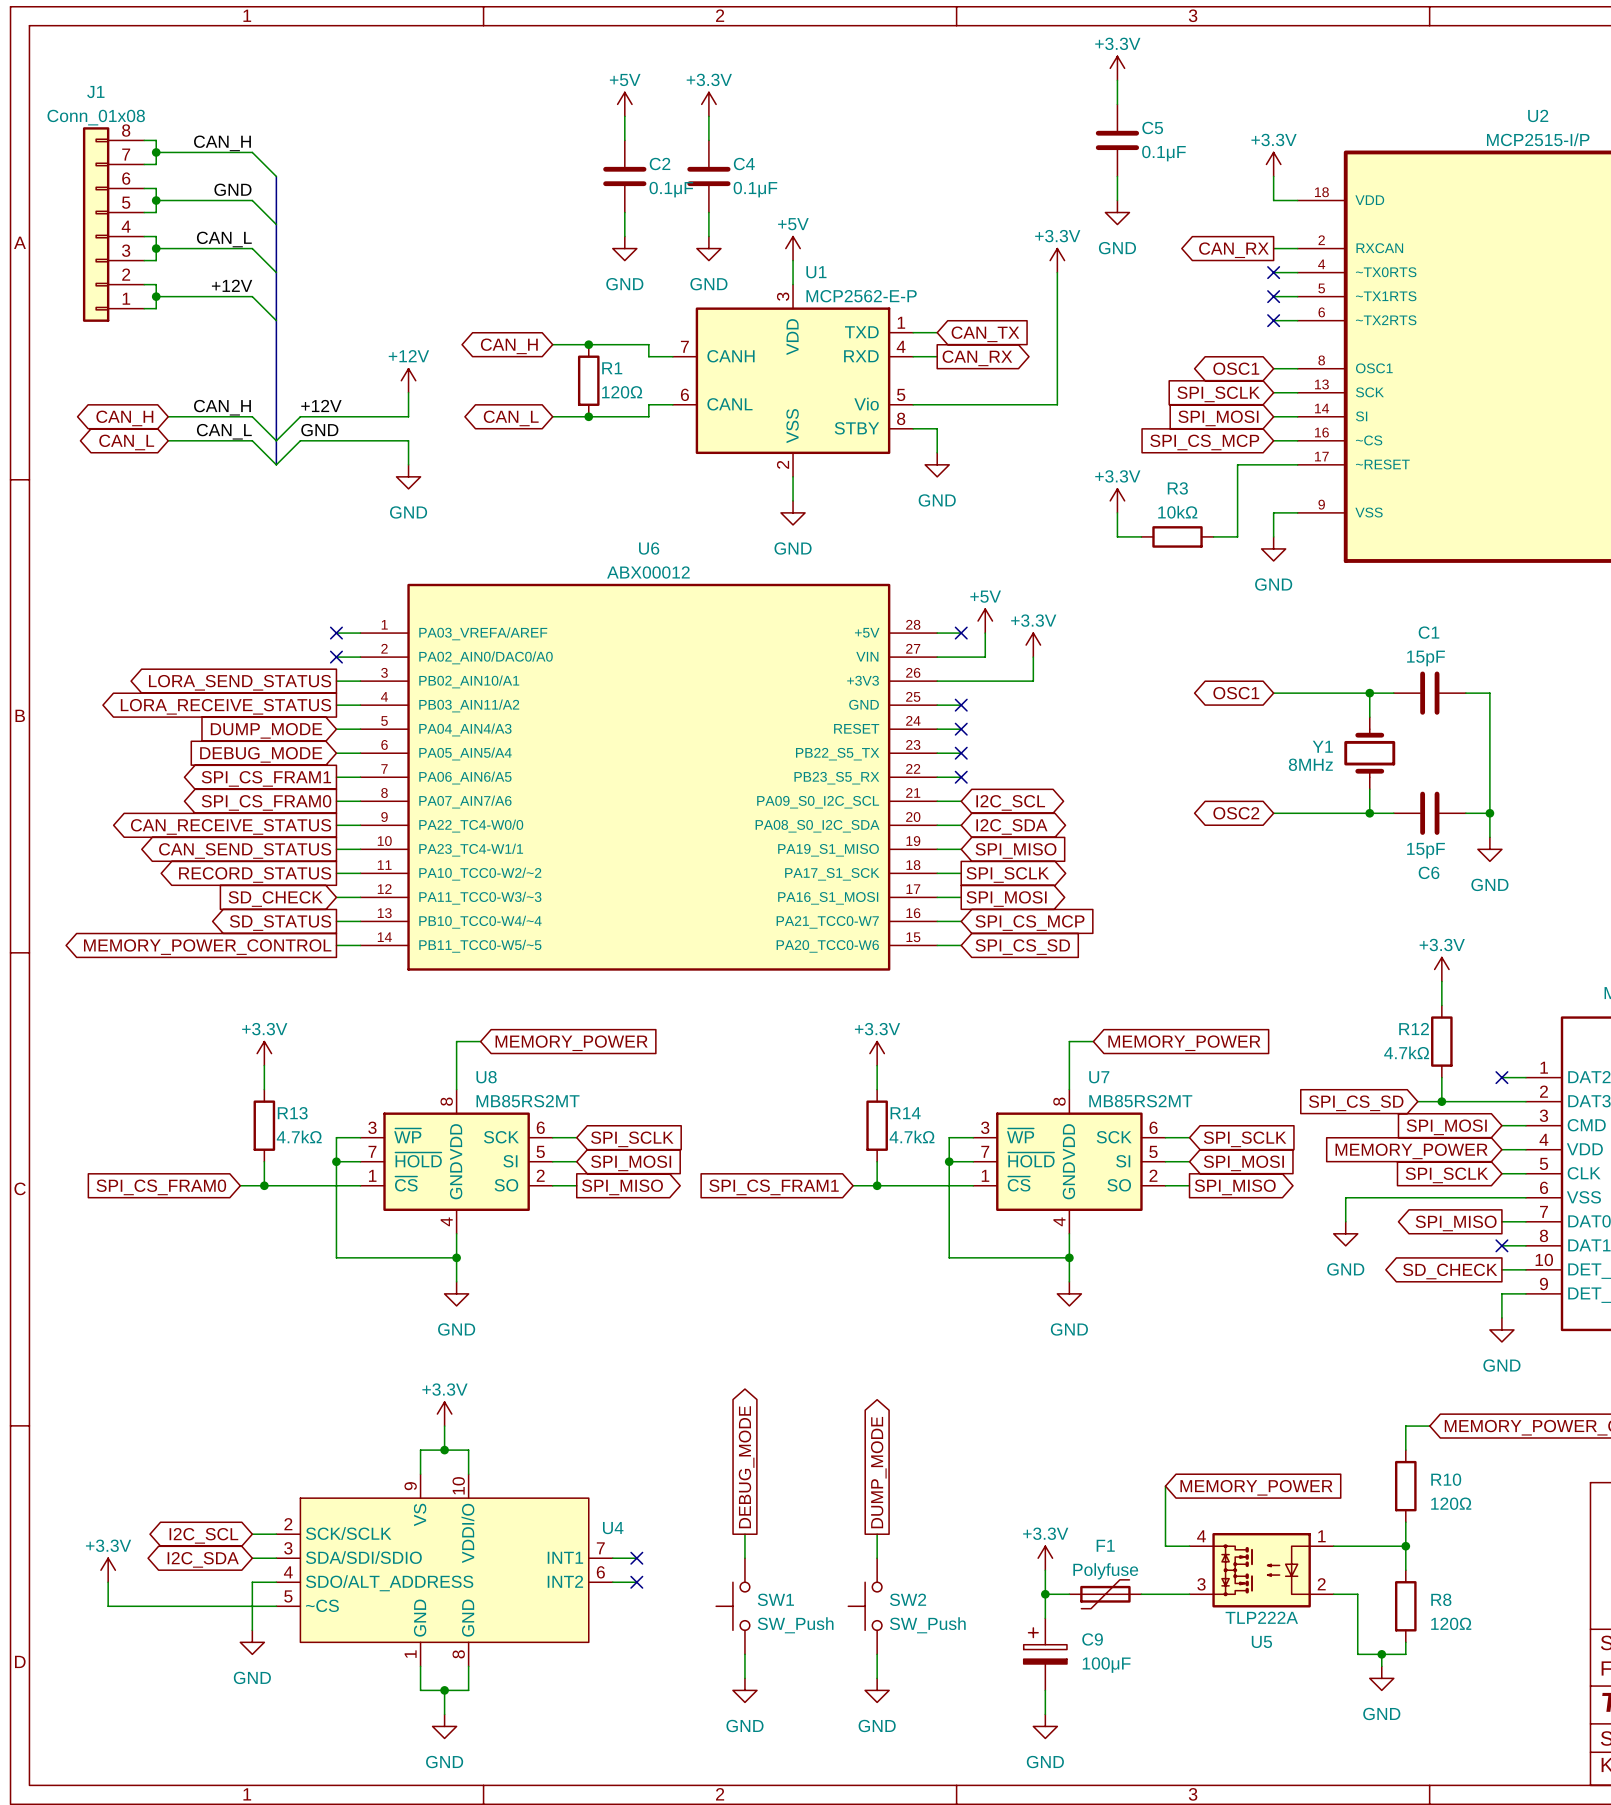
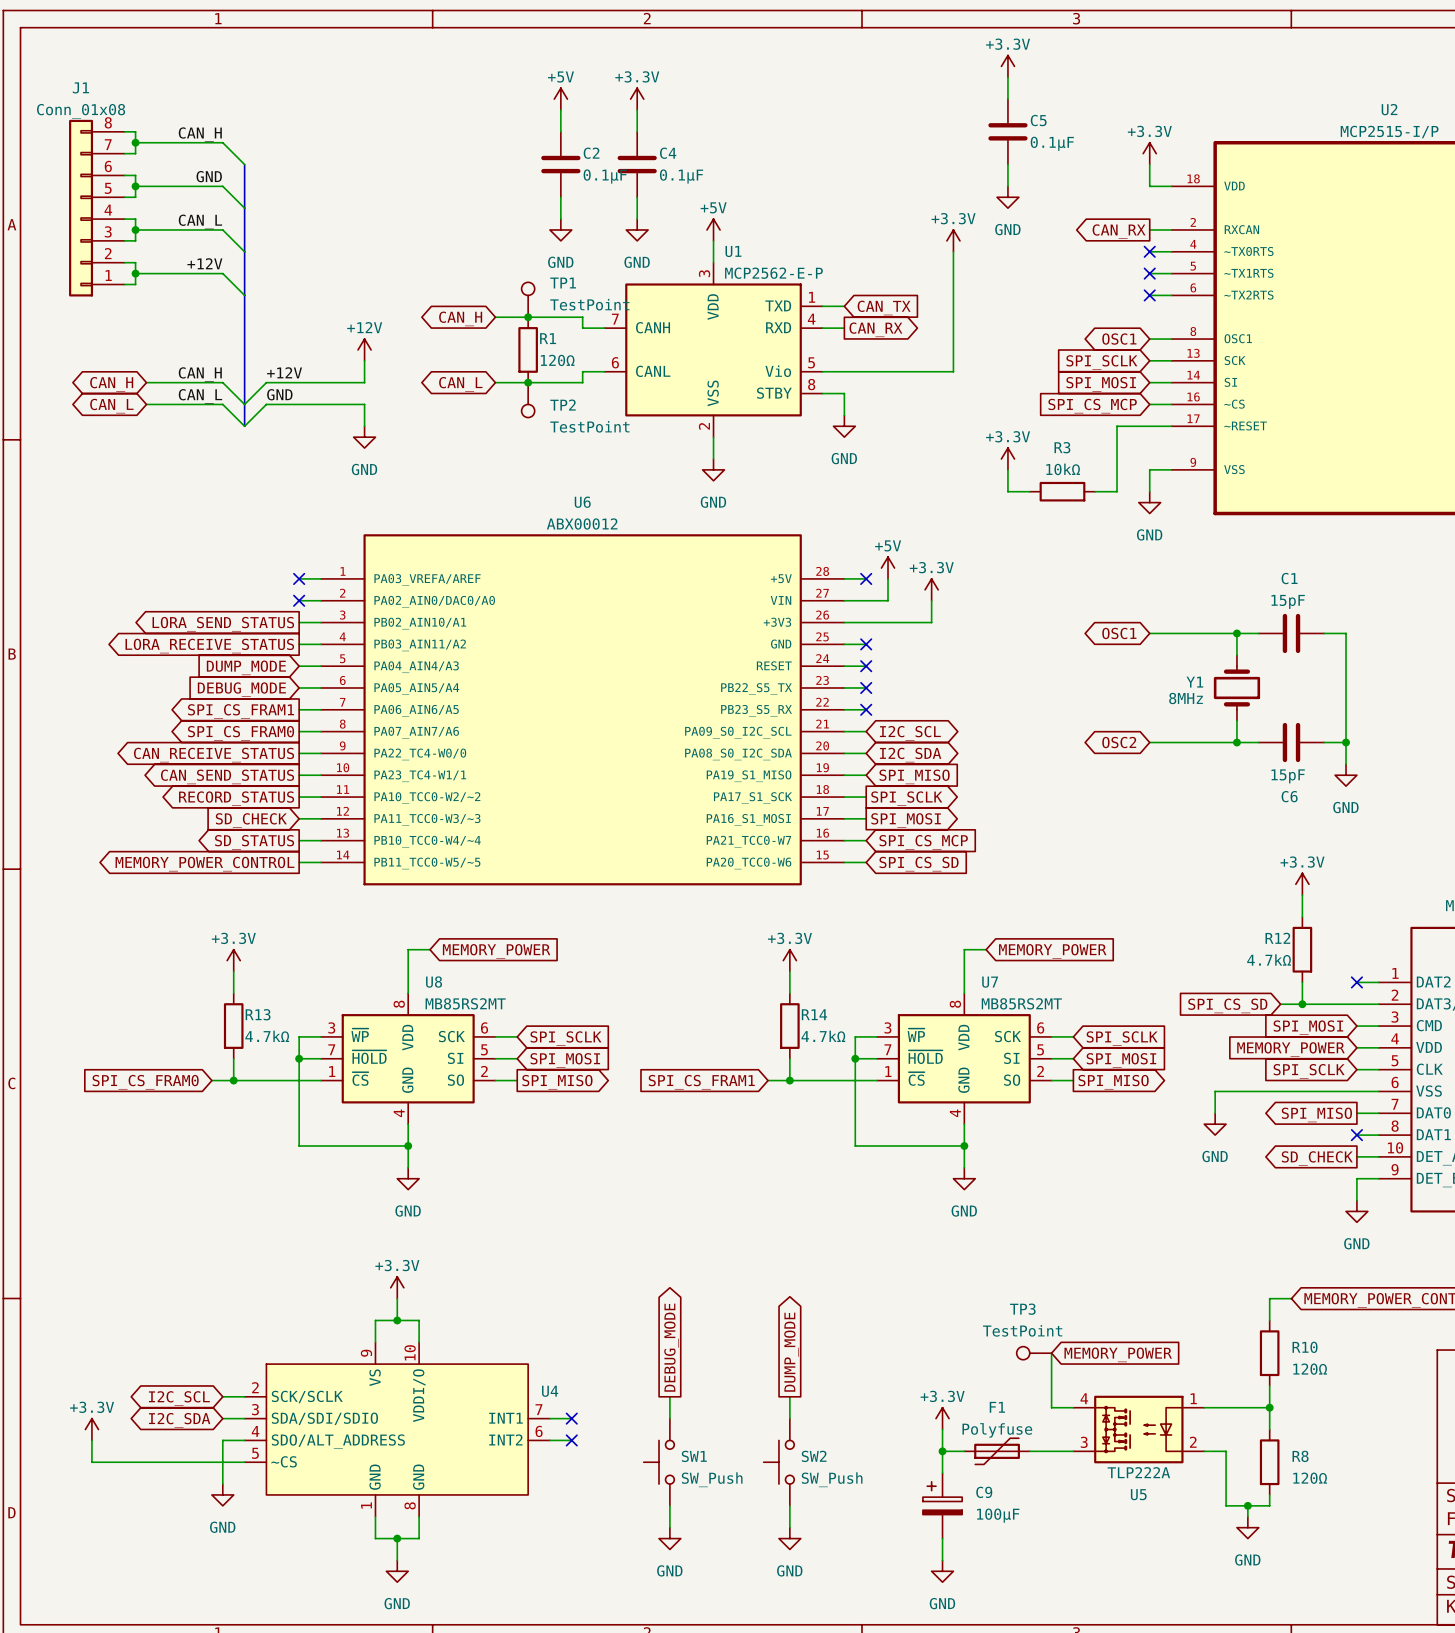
TP1: none -> TestPoint (528, 299)
TP2: none -> TestPoint (528, 400)
TP3: none -> TestPoint (1034, 1353)

